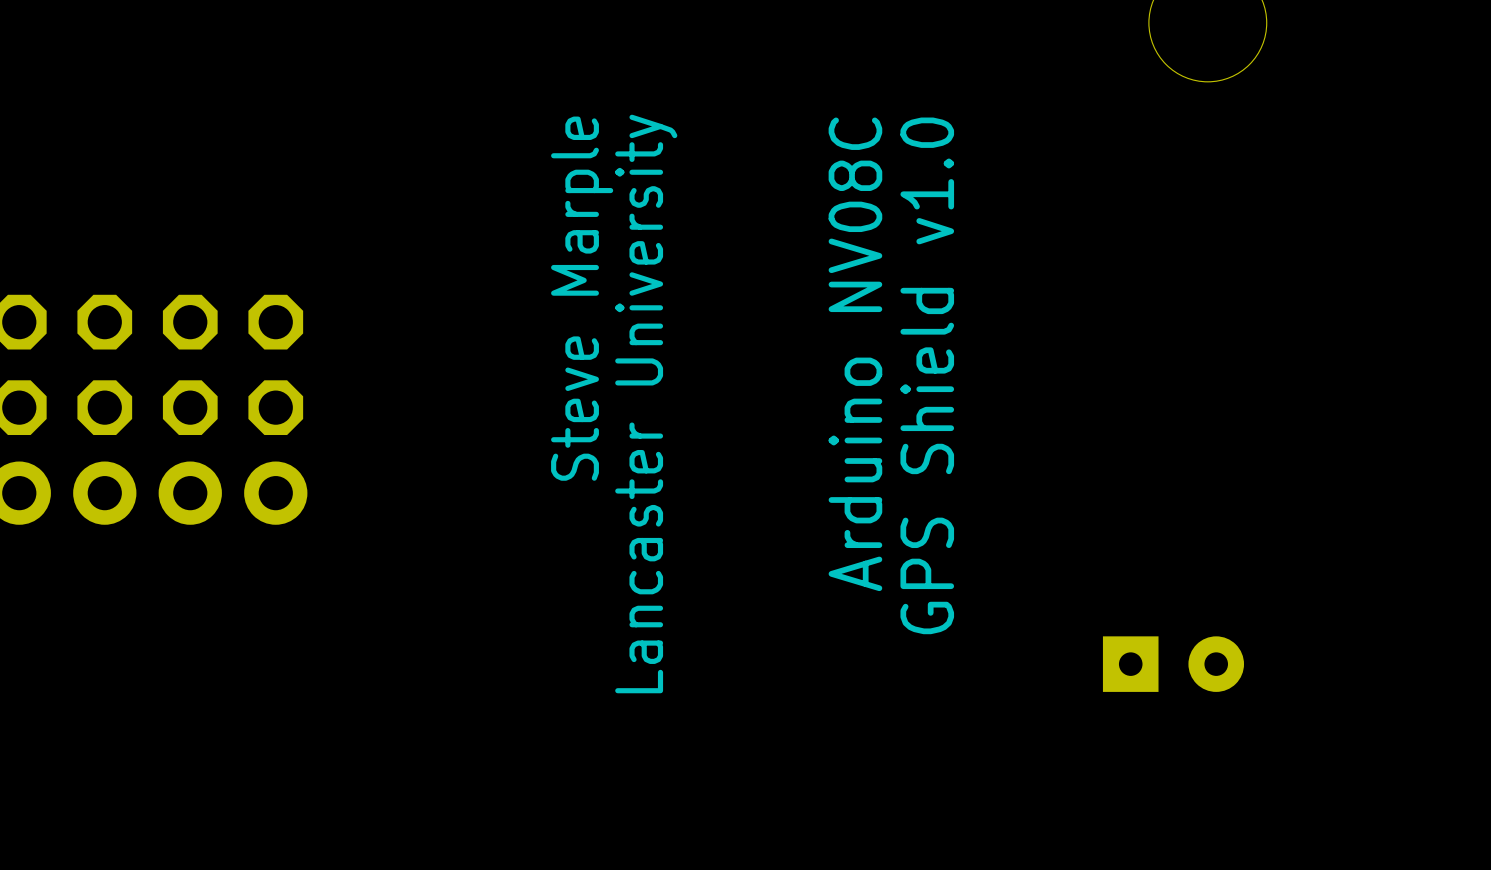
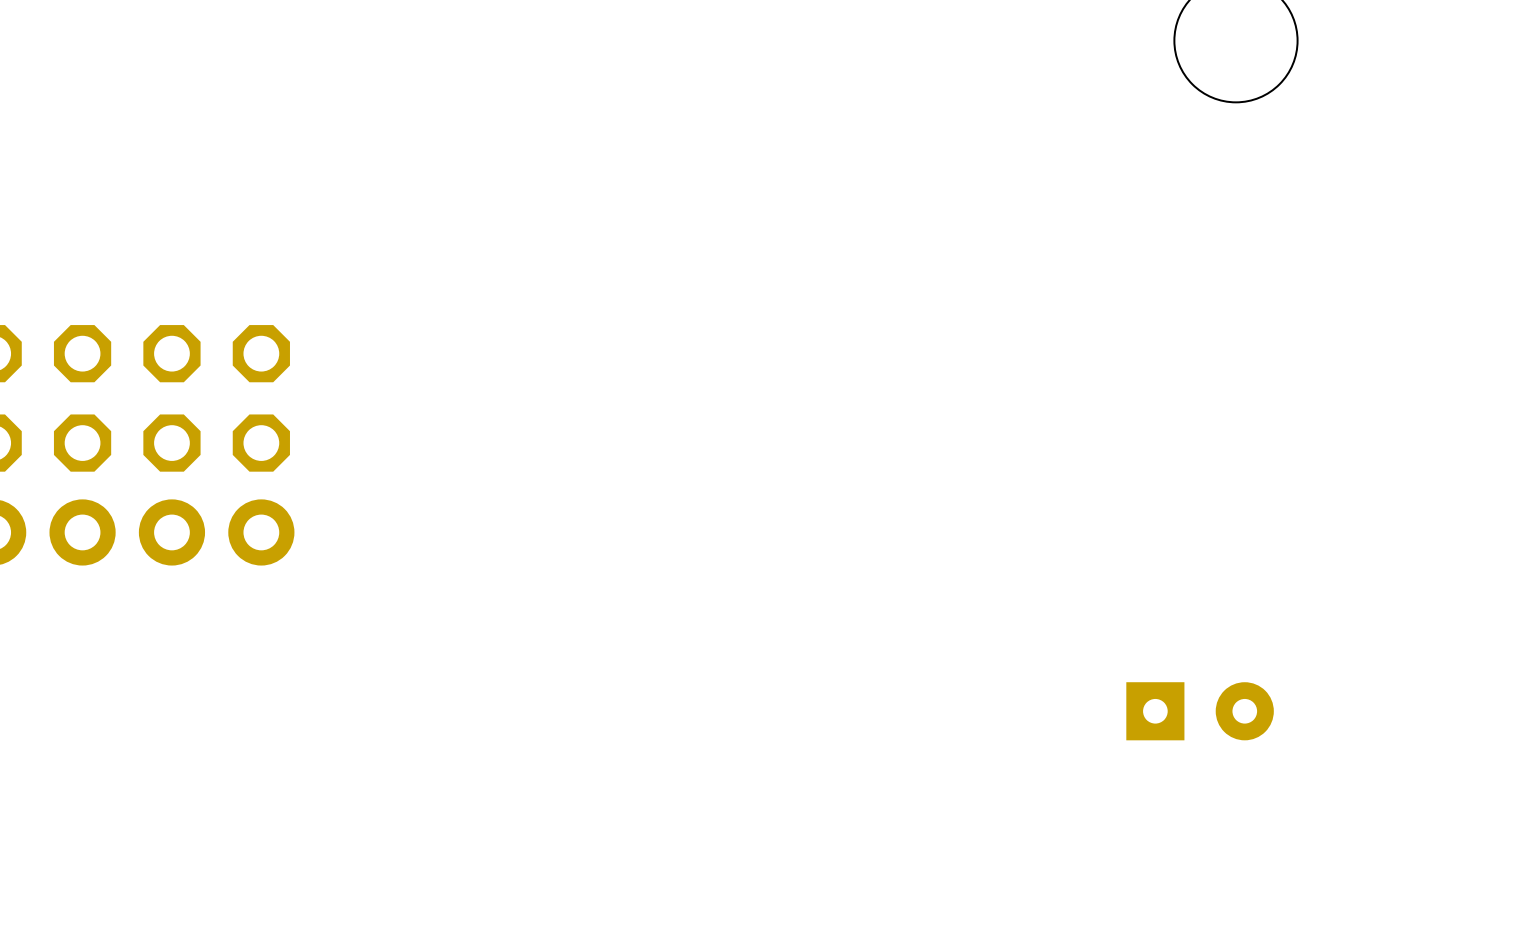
text: Steve Marple (582, 298) -> none
text: Arduino NV08C (855, 354) -> none
text: GPS Shield v1.0 (927, 375) -> none
text: Lancaster University (646, 404) -> none

